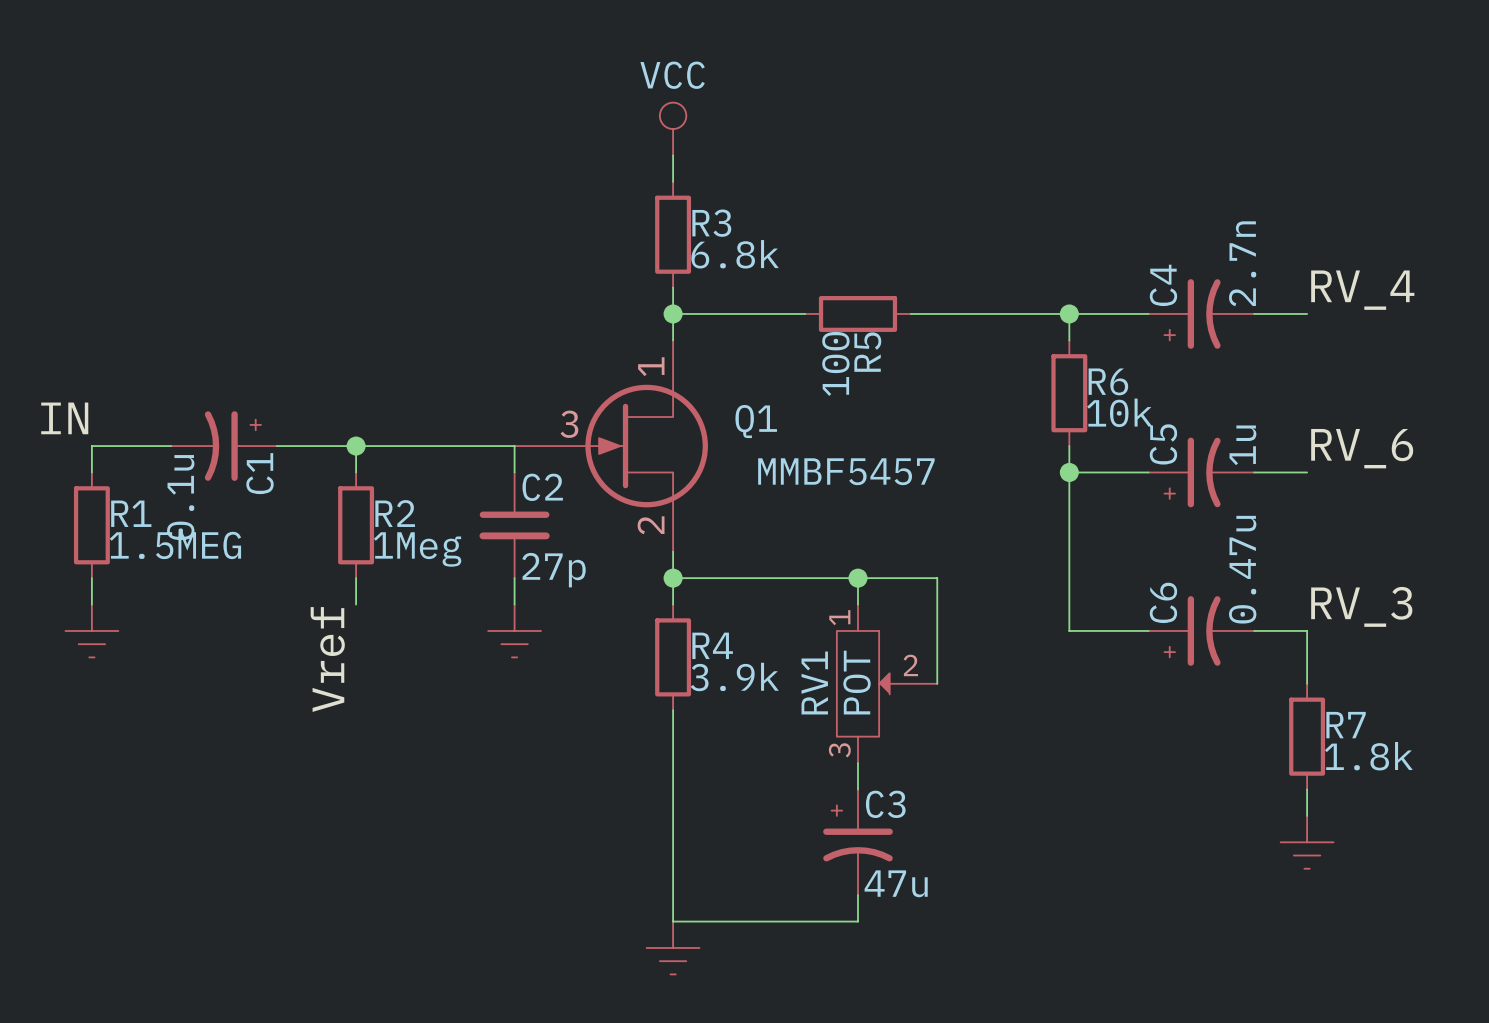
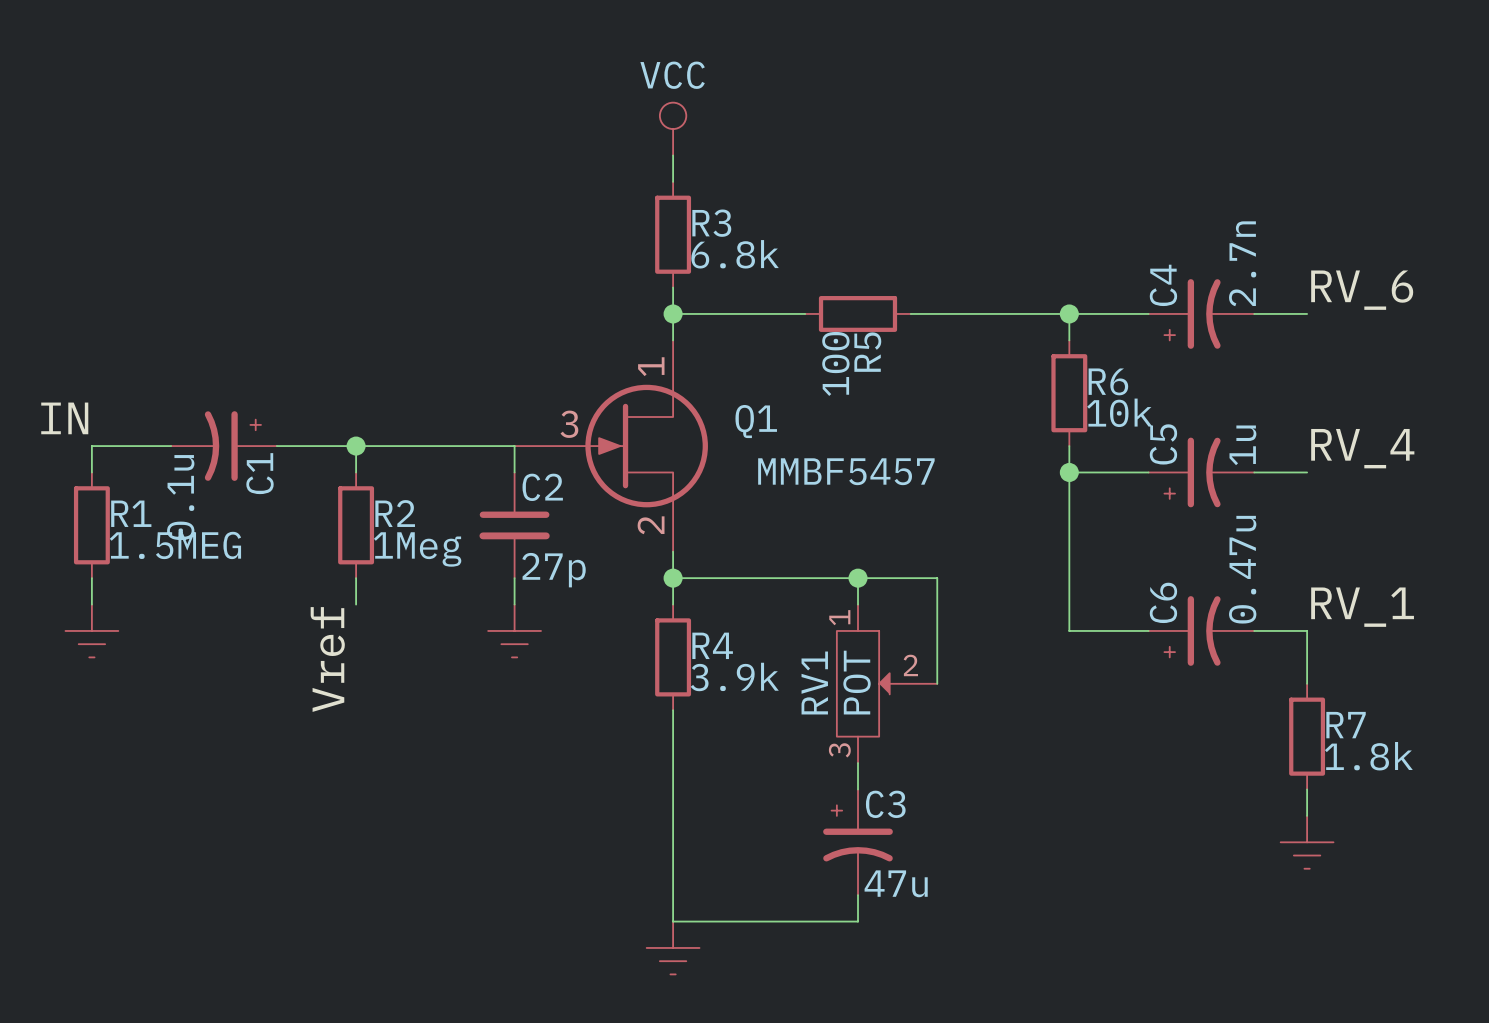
label: RV_4 (1362, 290) -> RV_6 (1362, 290)
label: RV_6 (1362, 448) -> RV_4 (1362, 448)
label: RV_3 (1361, 606) -> RV_1 (1362, 607)

